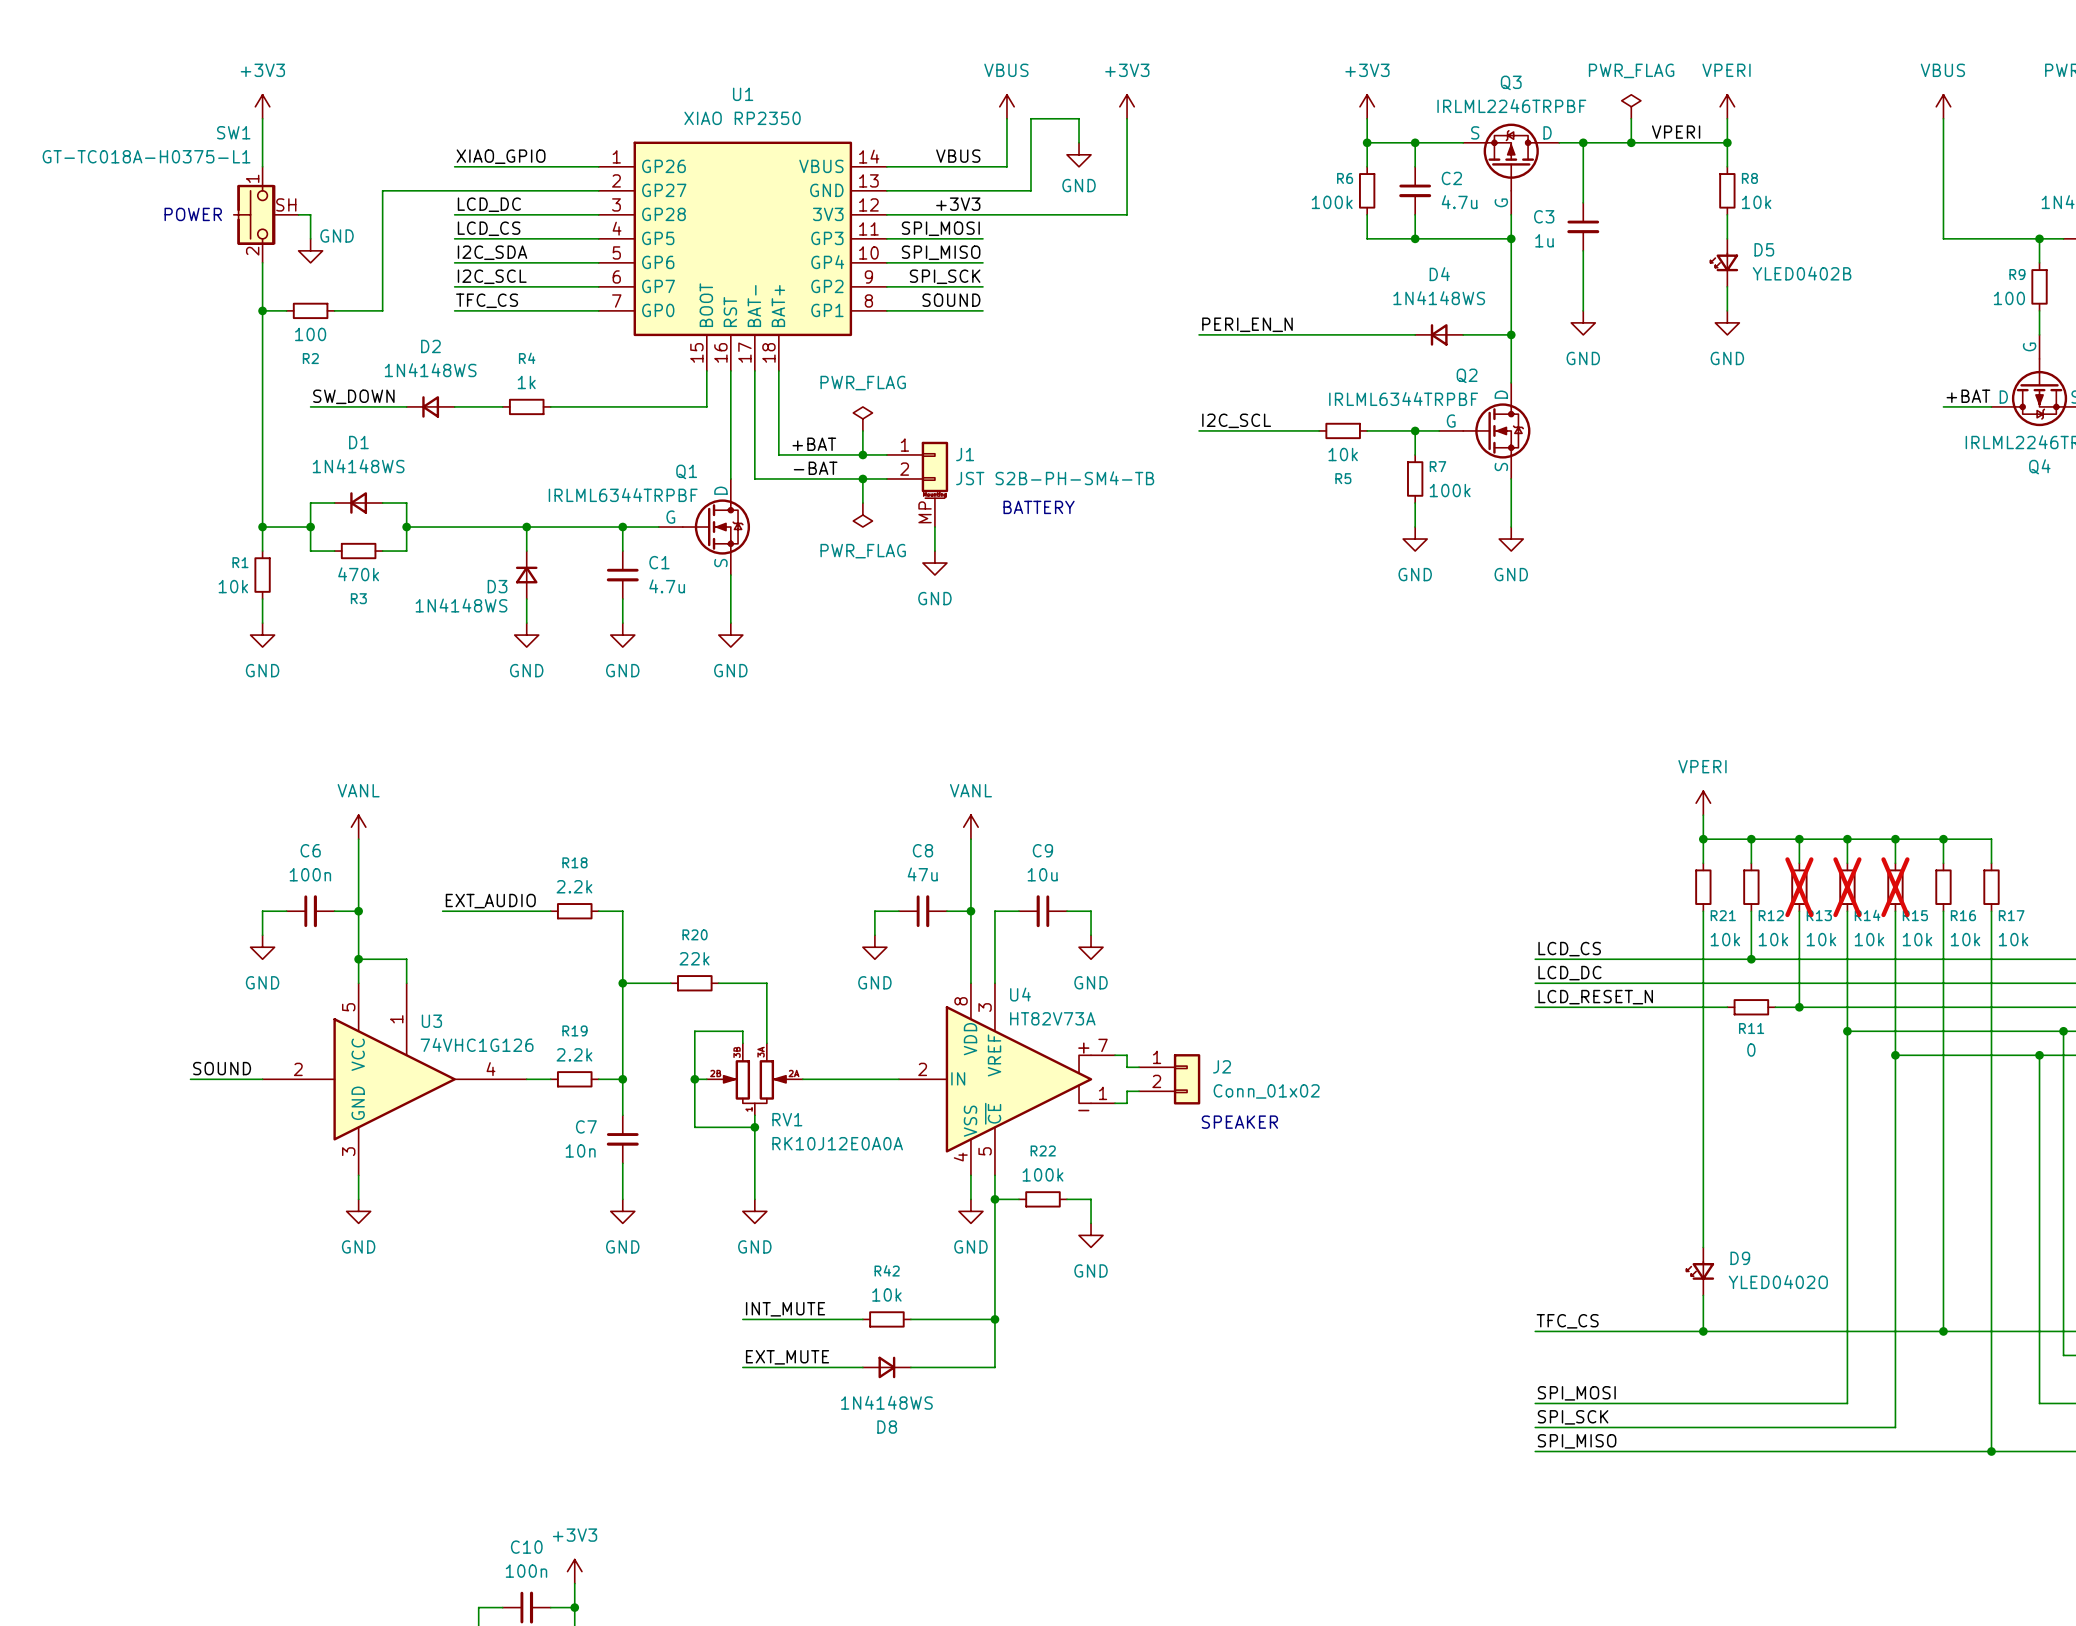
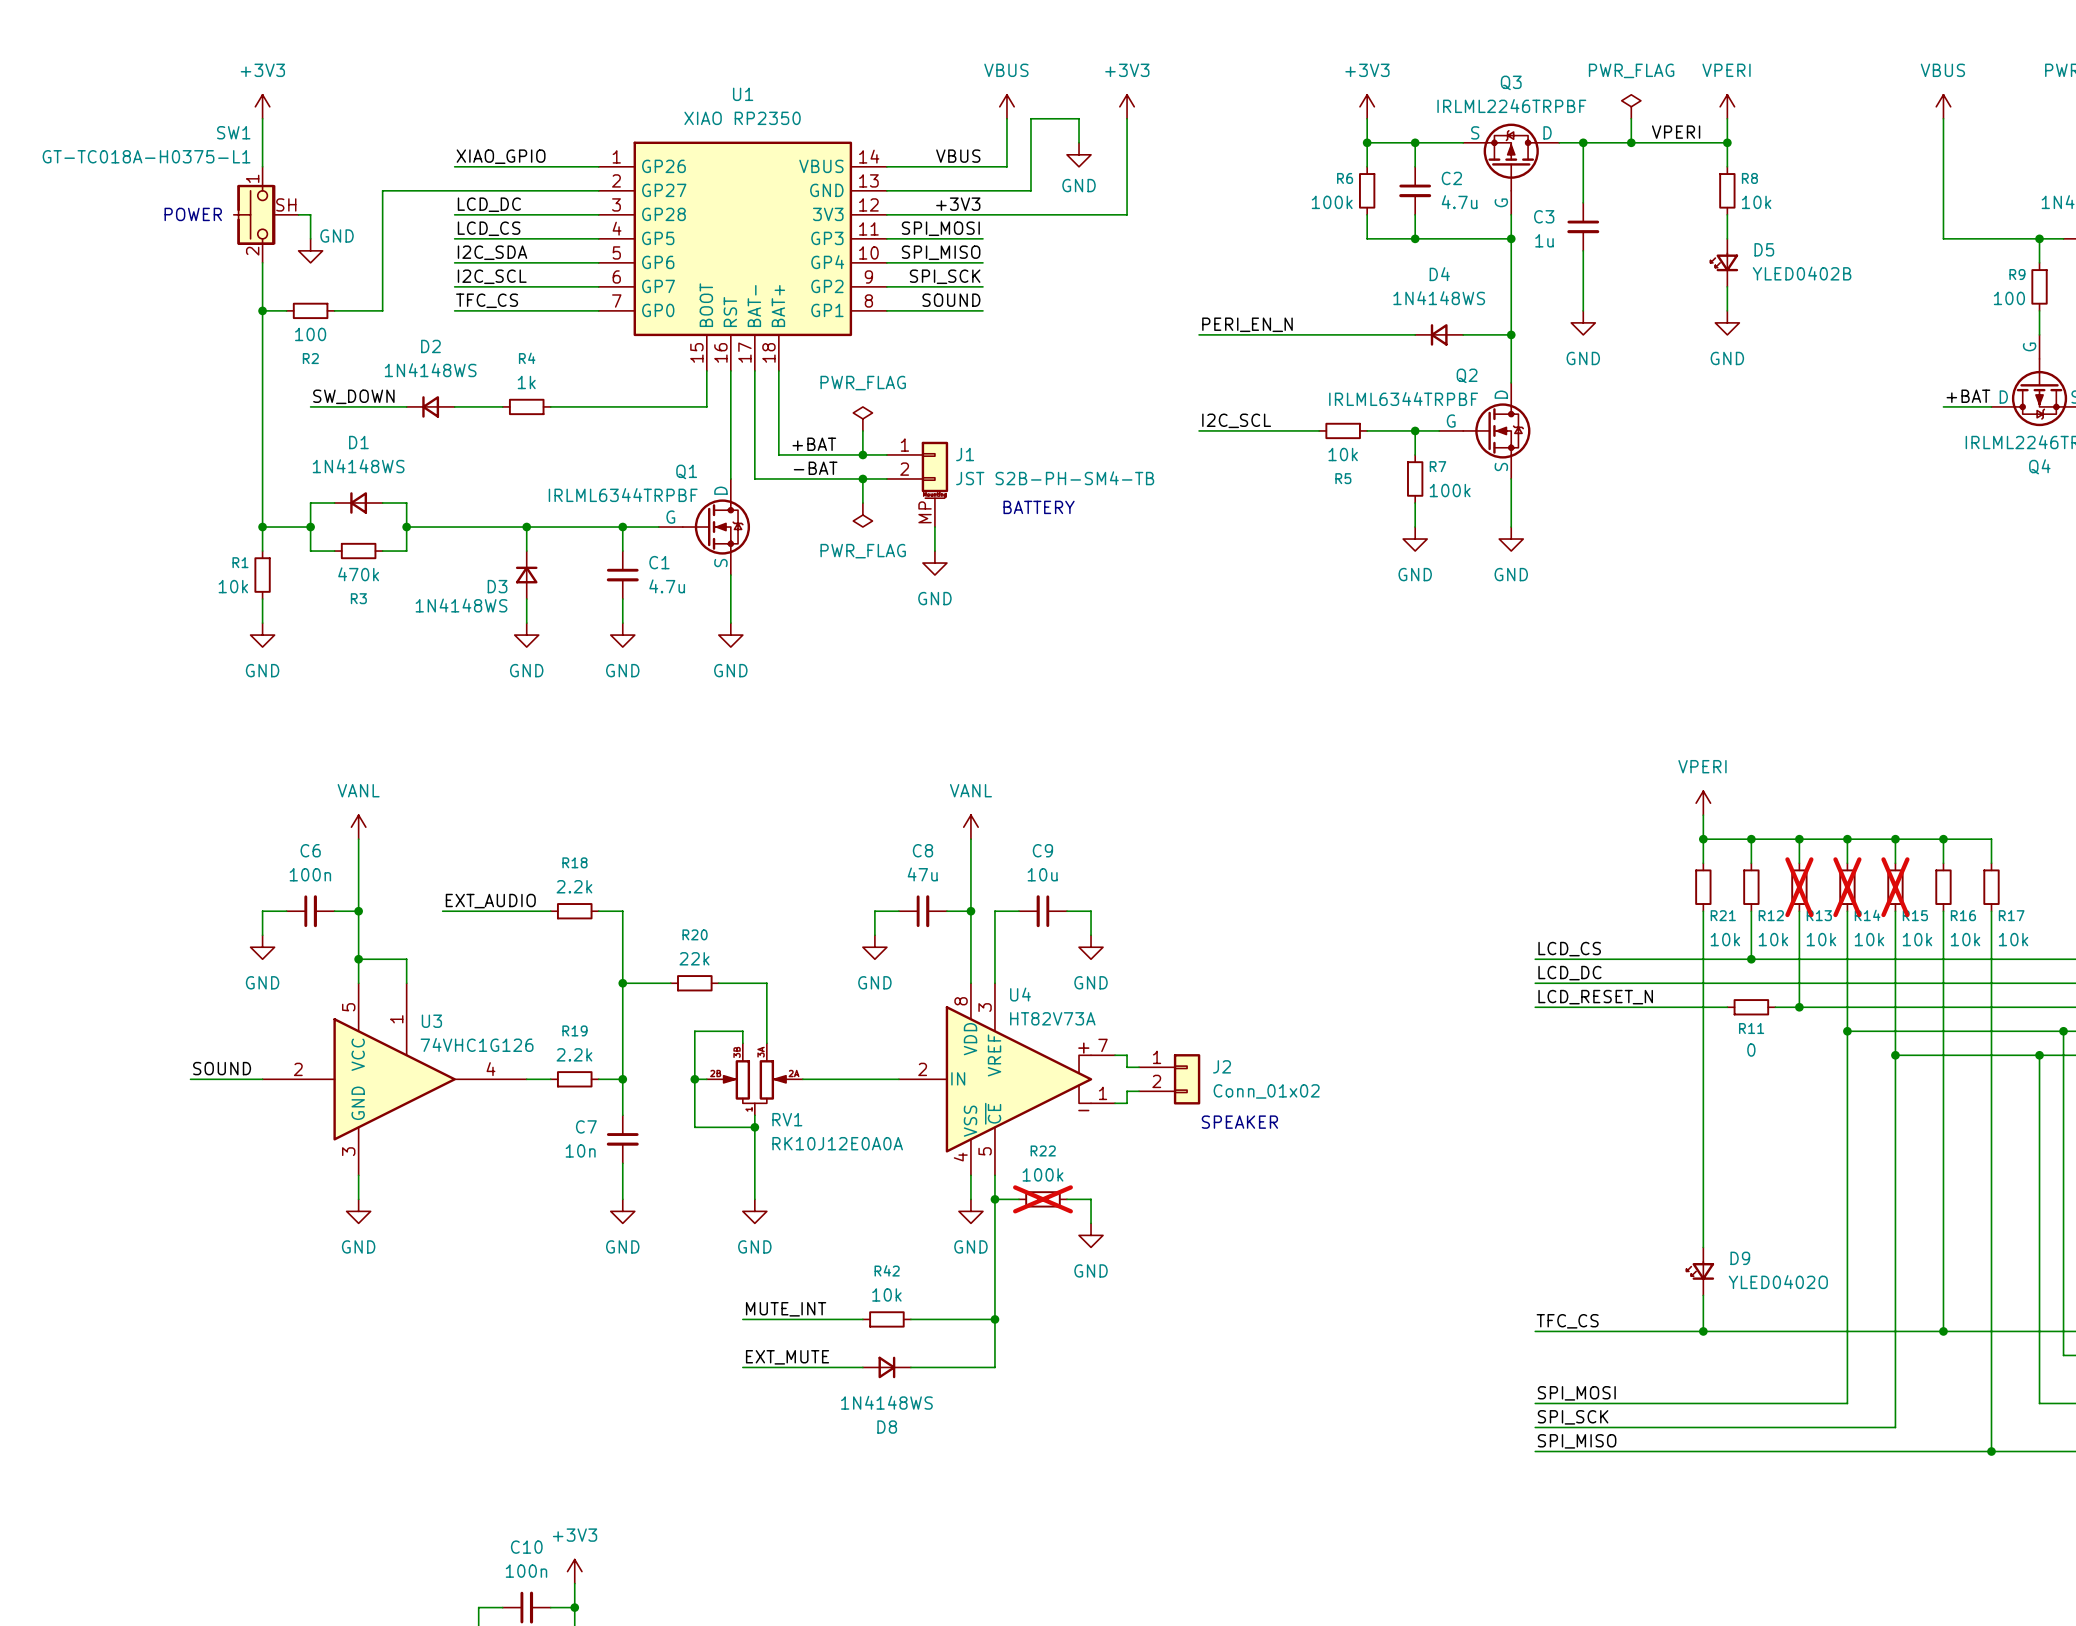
R22 do-not-place cross: none -> (1042, 1199)
label: INT_MUTE (785, 1309) -> MUTE_INT (786, 1309)

